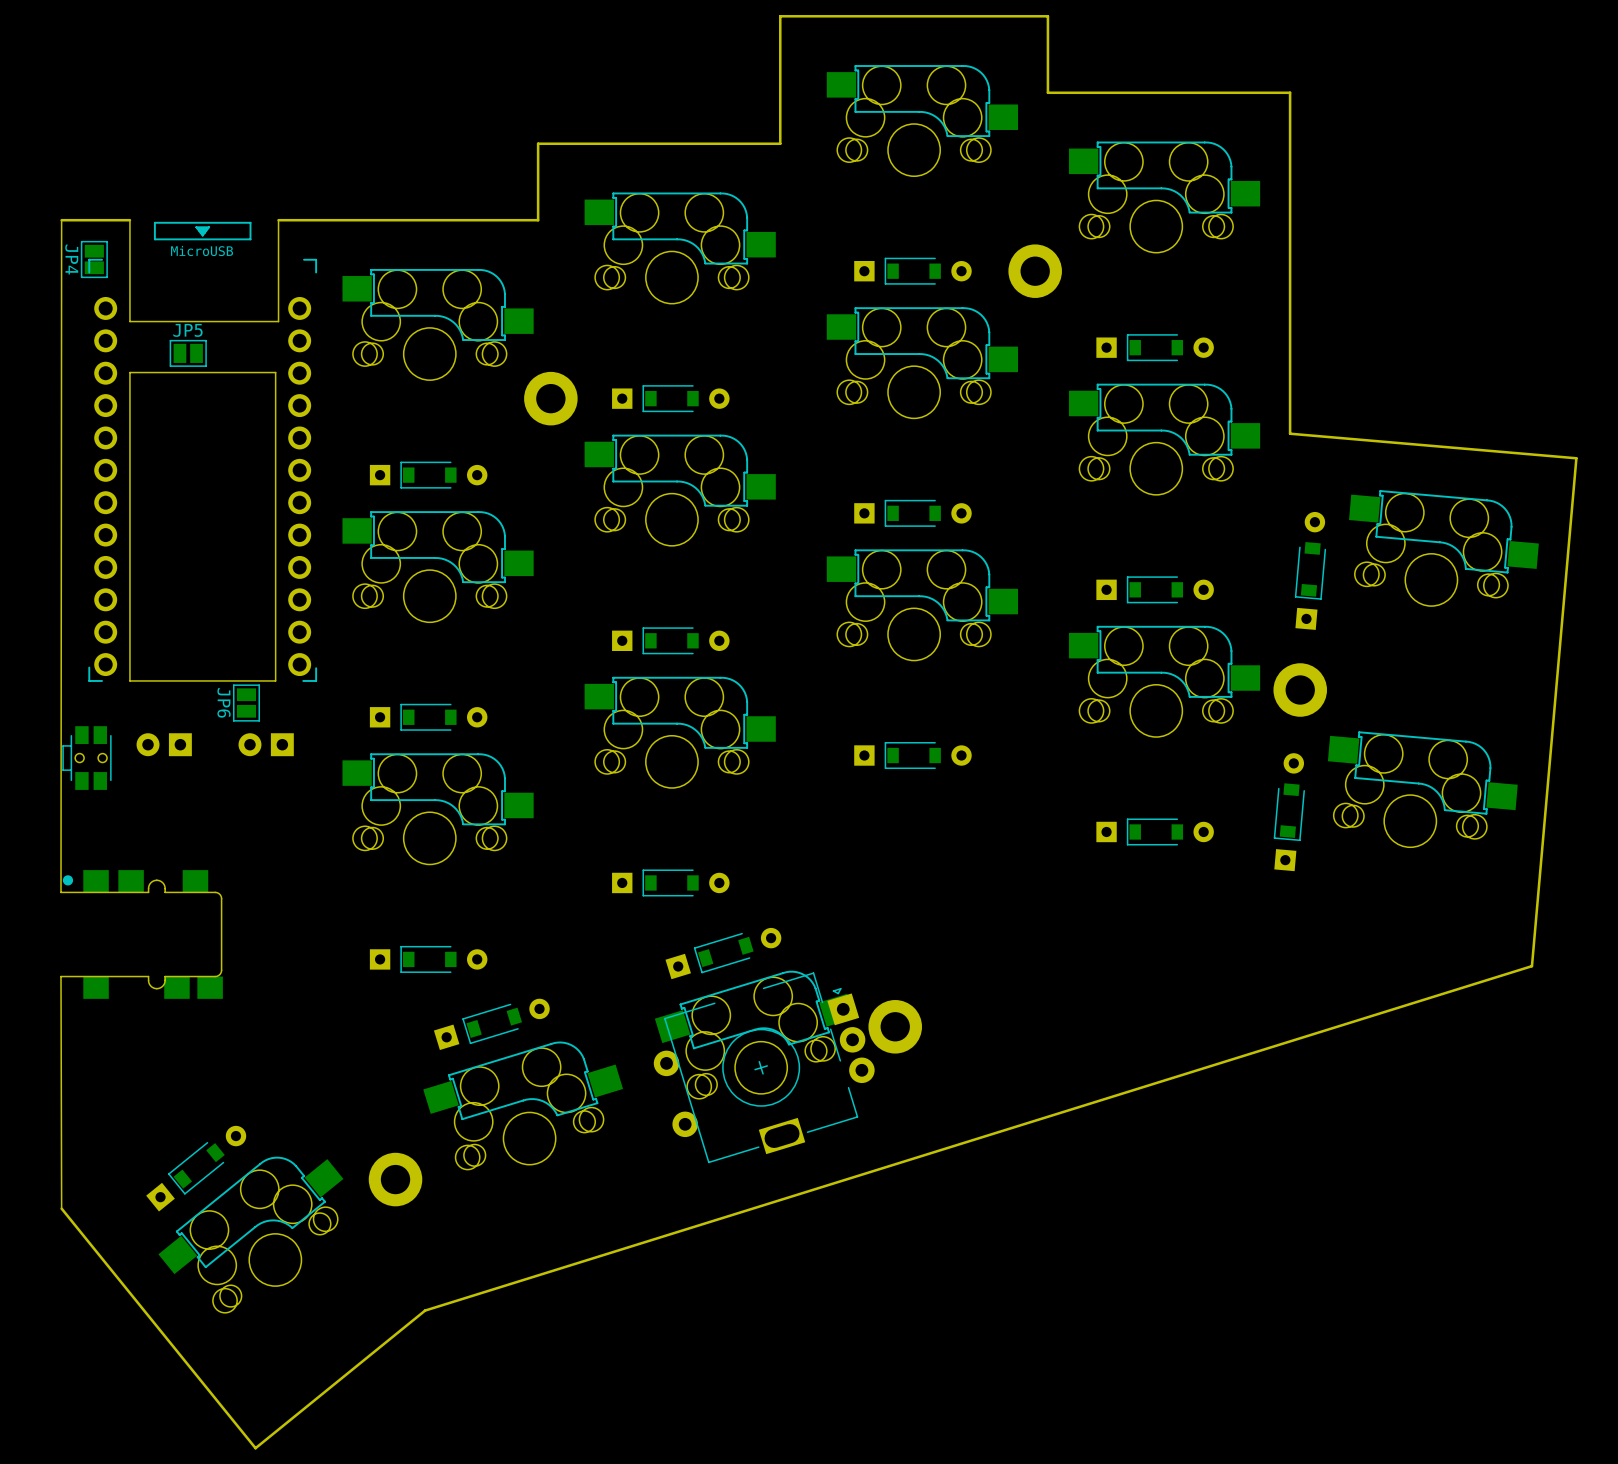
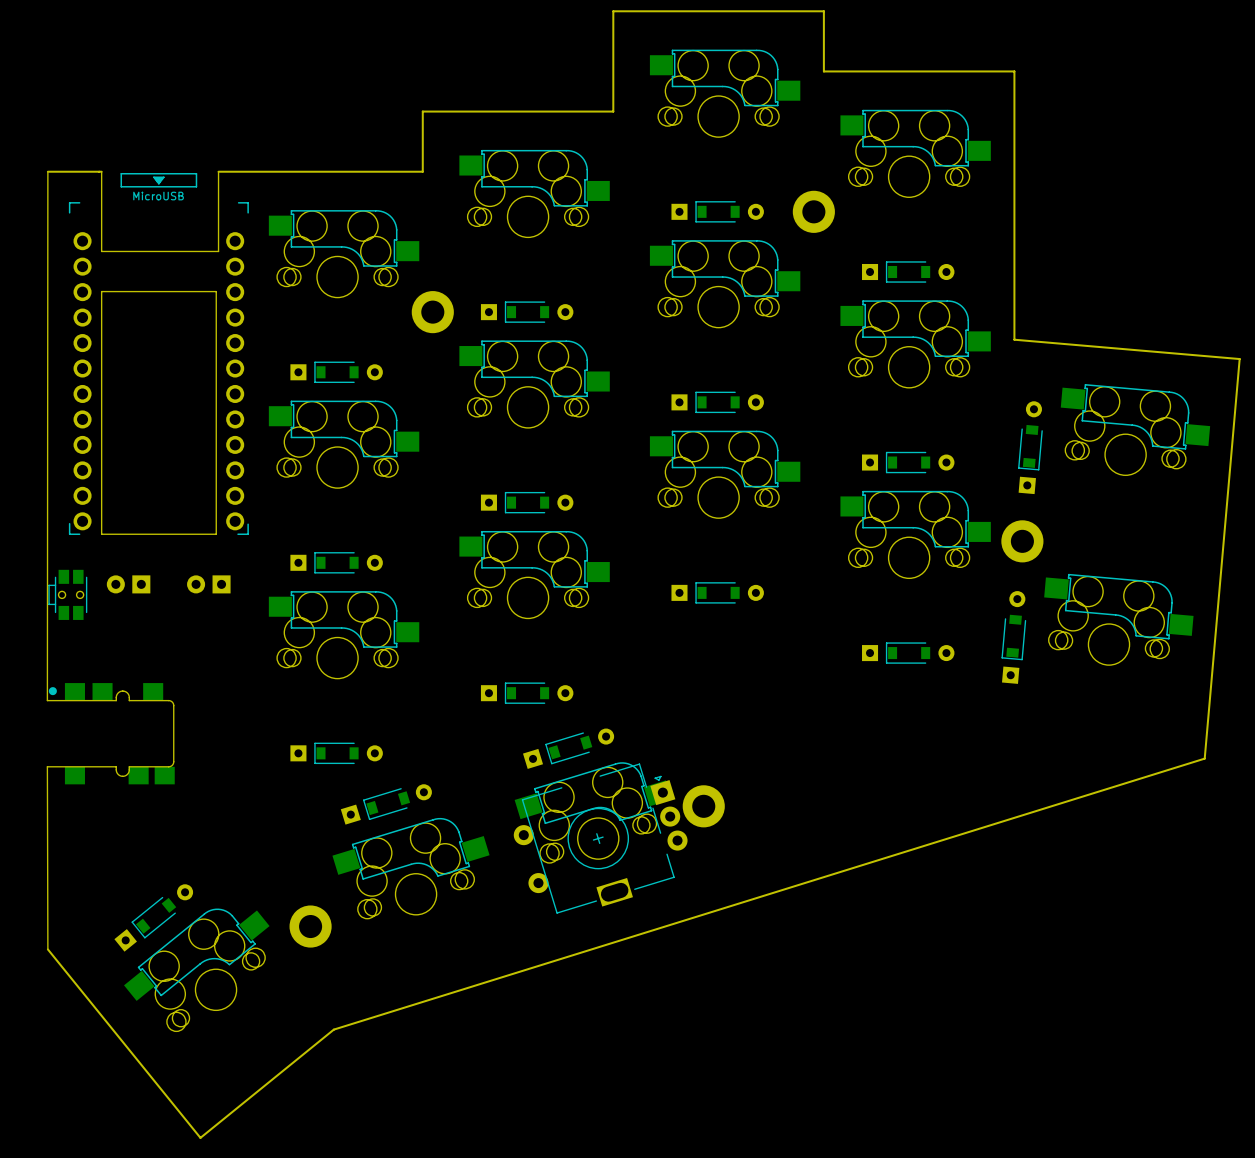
JP4: (94, 259) -> none
JP5: (188, 353) -> none
JP6: (246, 703) -> none

